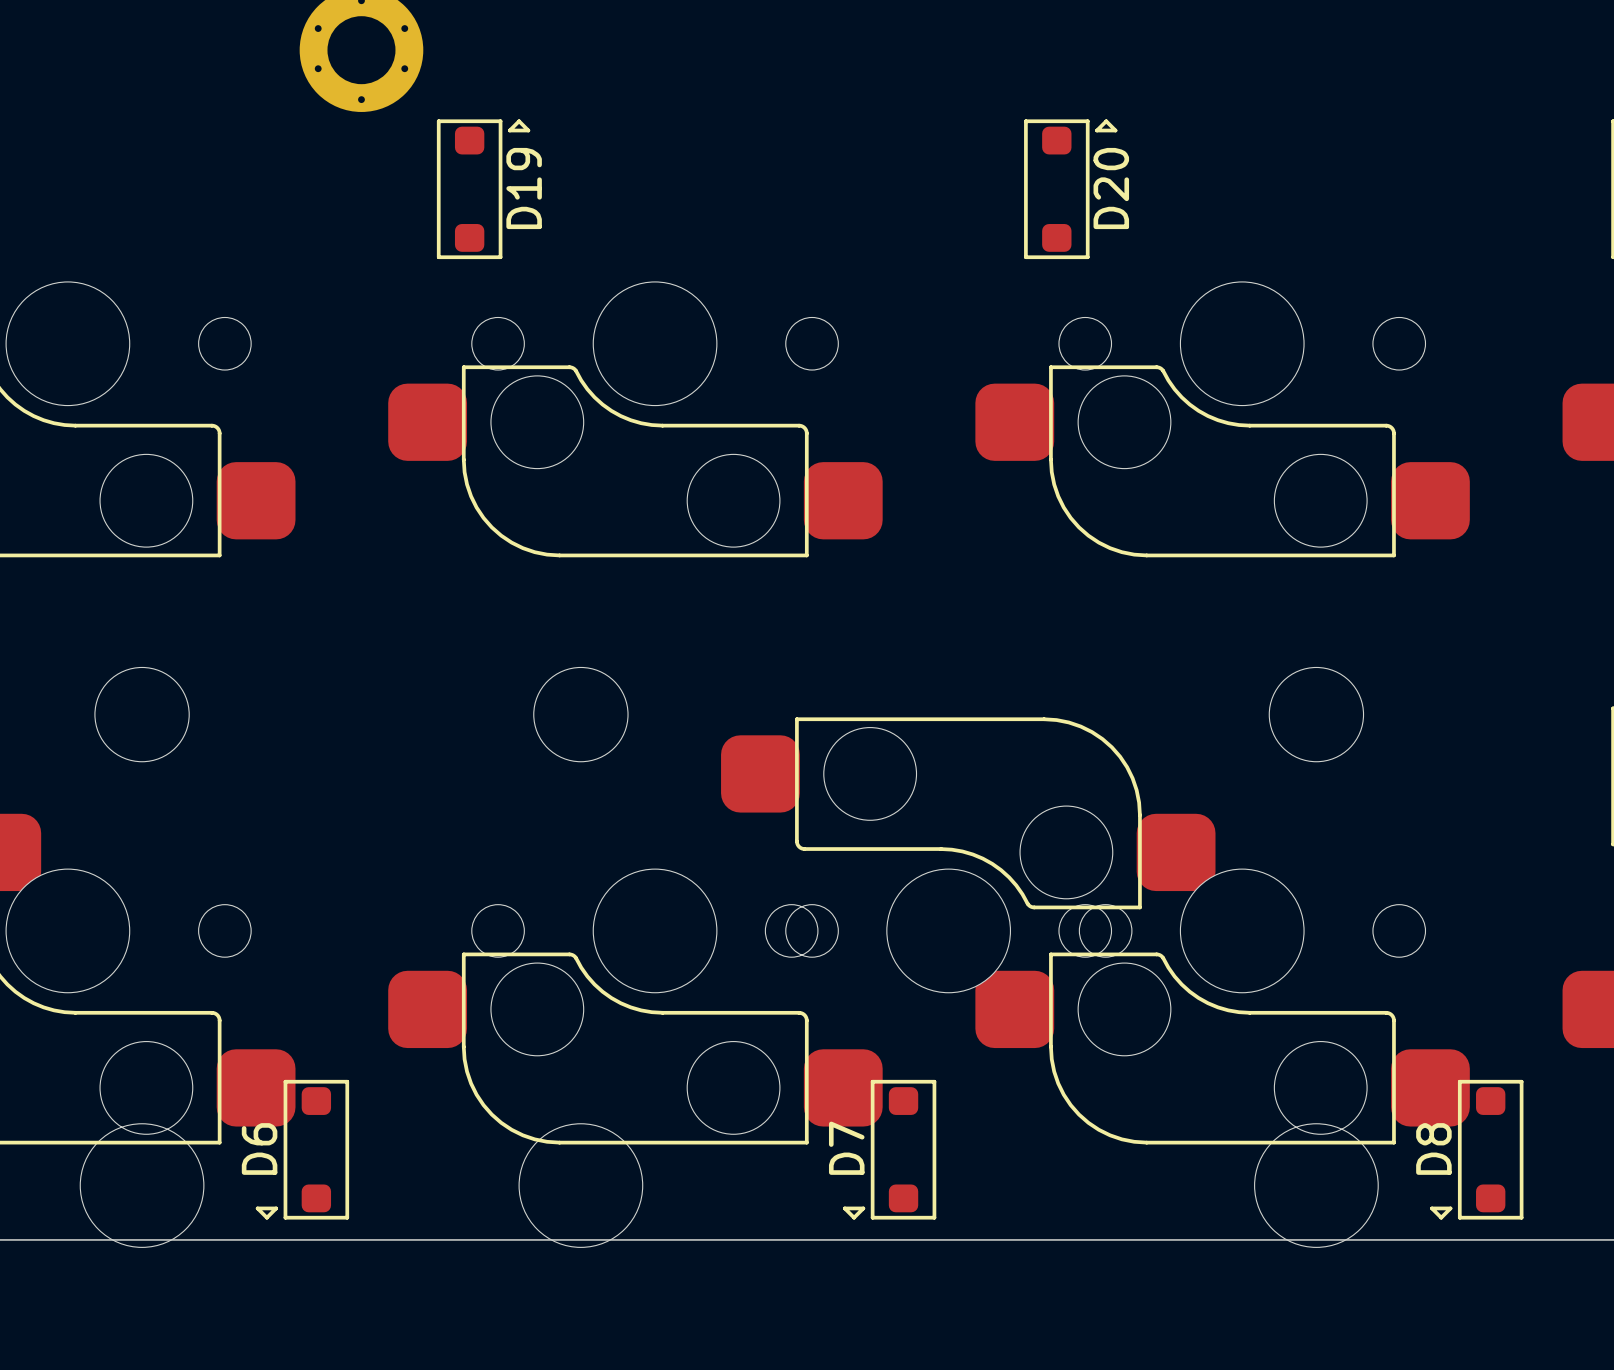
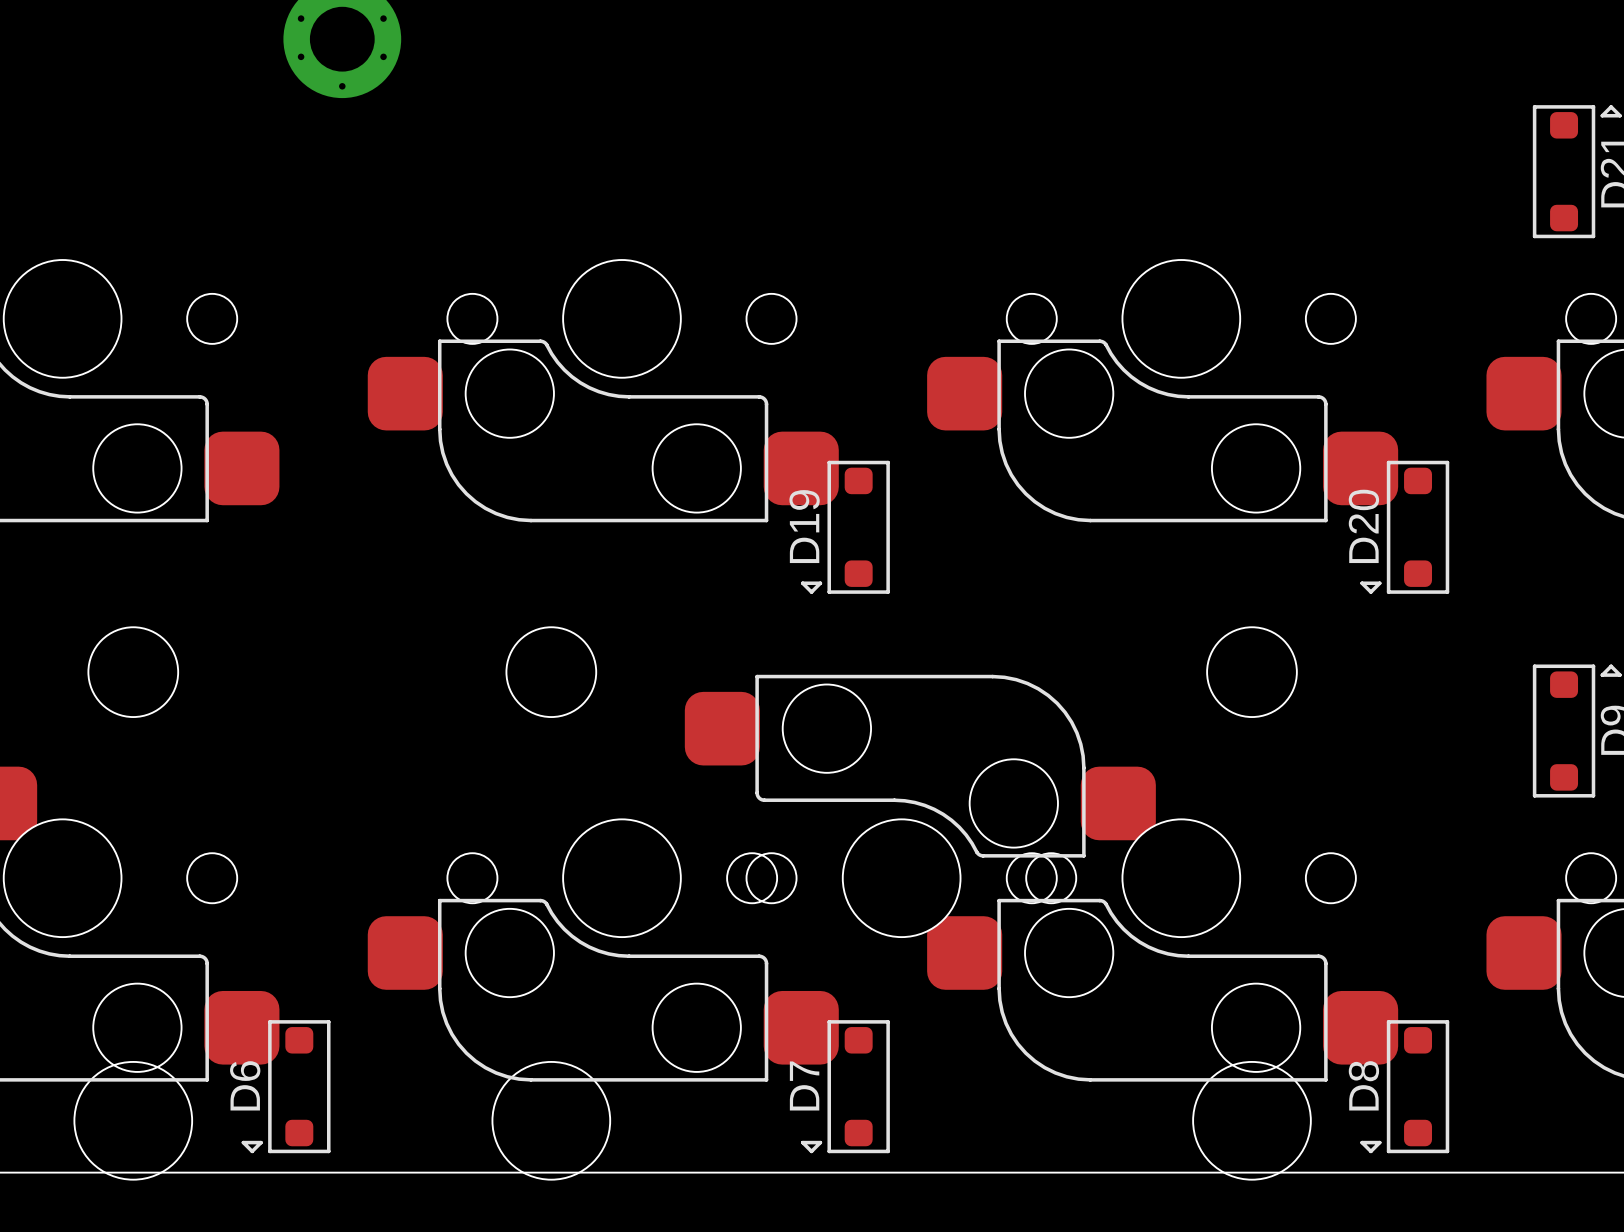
D19 rotation: 0° (483, 189) -> 180° (845, 527)
D19 position: (483, 189) -> (845, 527)
D20 rotation: 0° (1070, 189) -> 180° (1404, 527)
D20 position: (1070, 189) -> (1404, 527)

